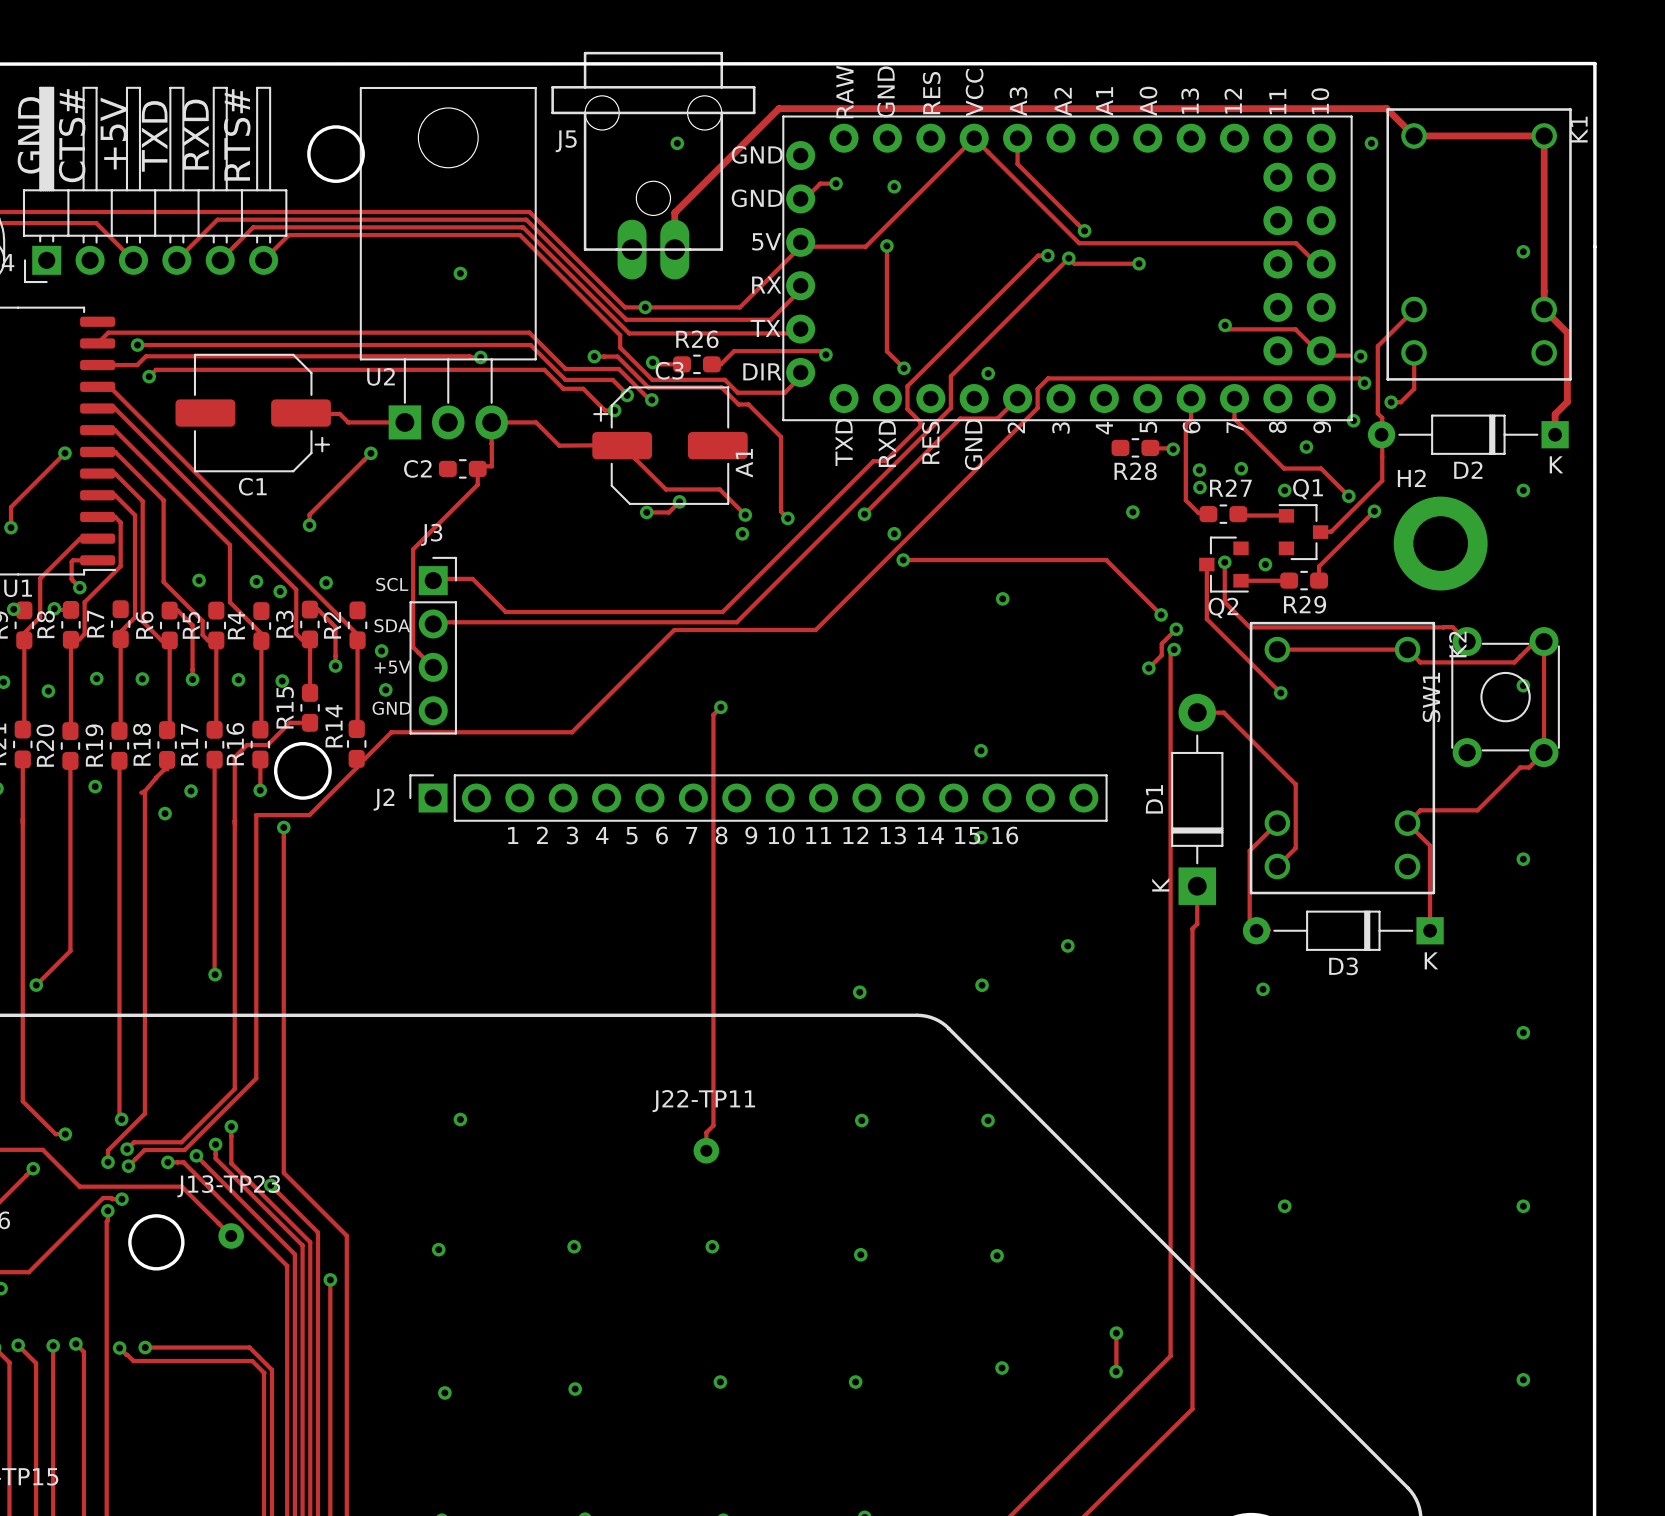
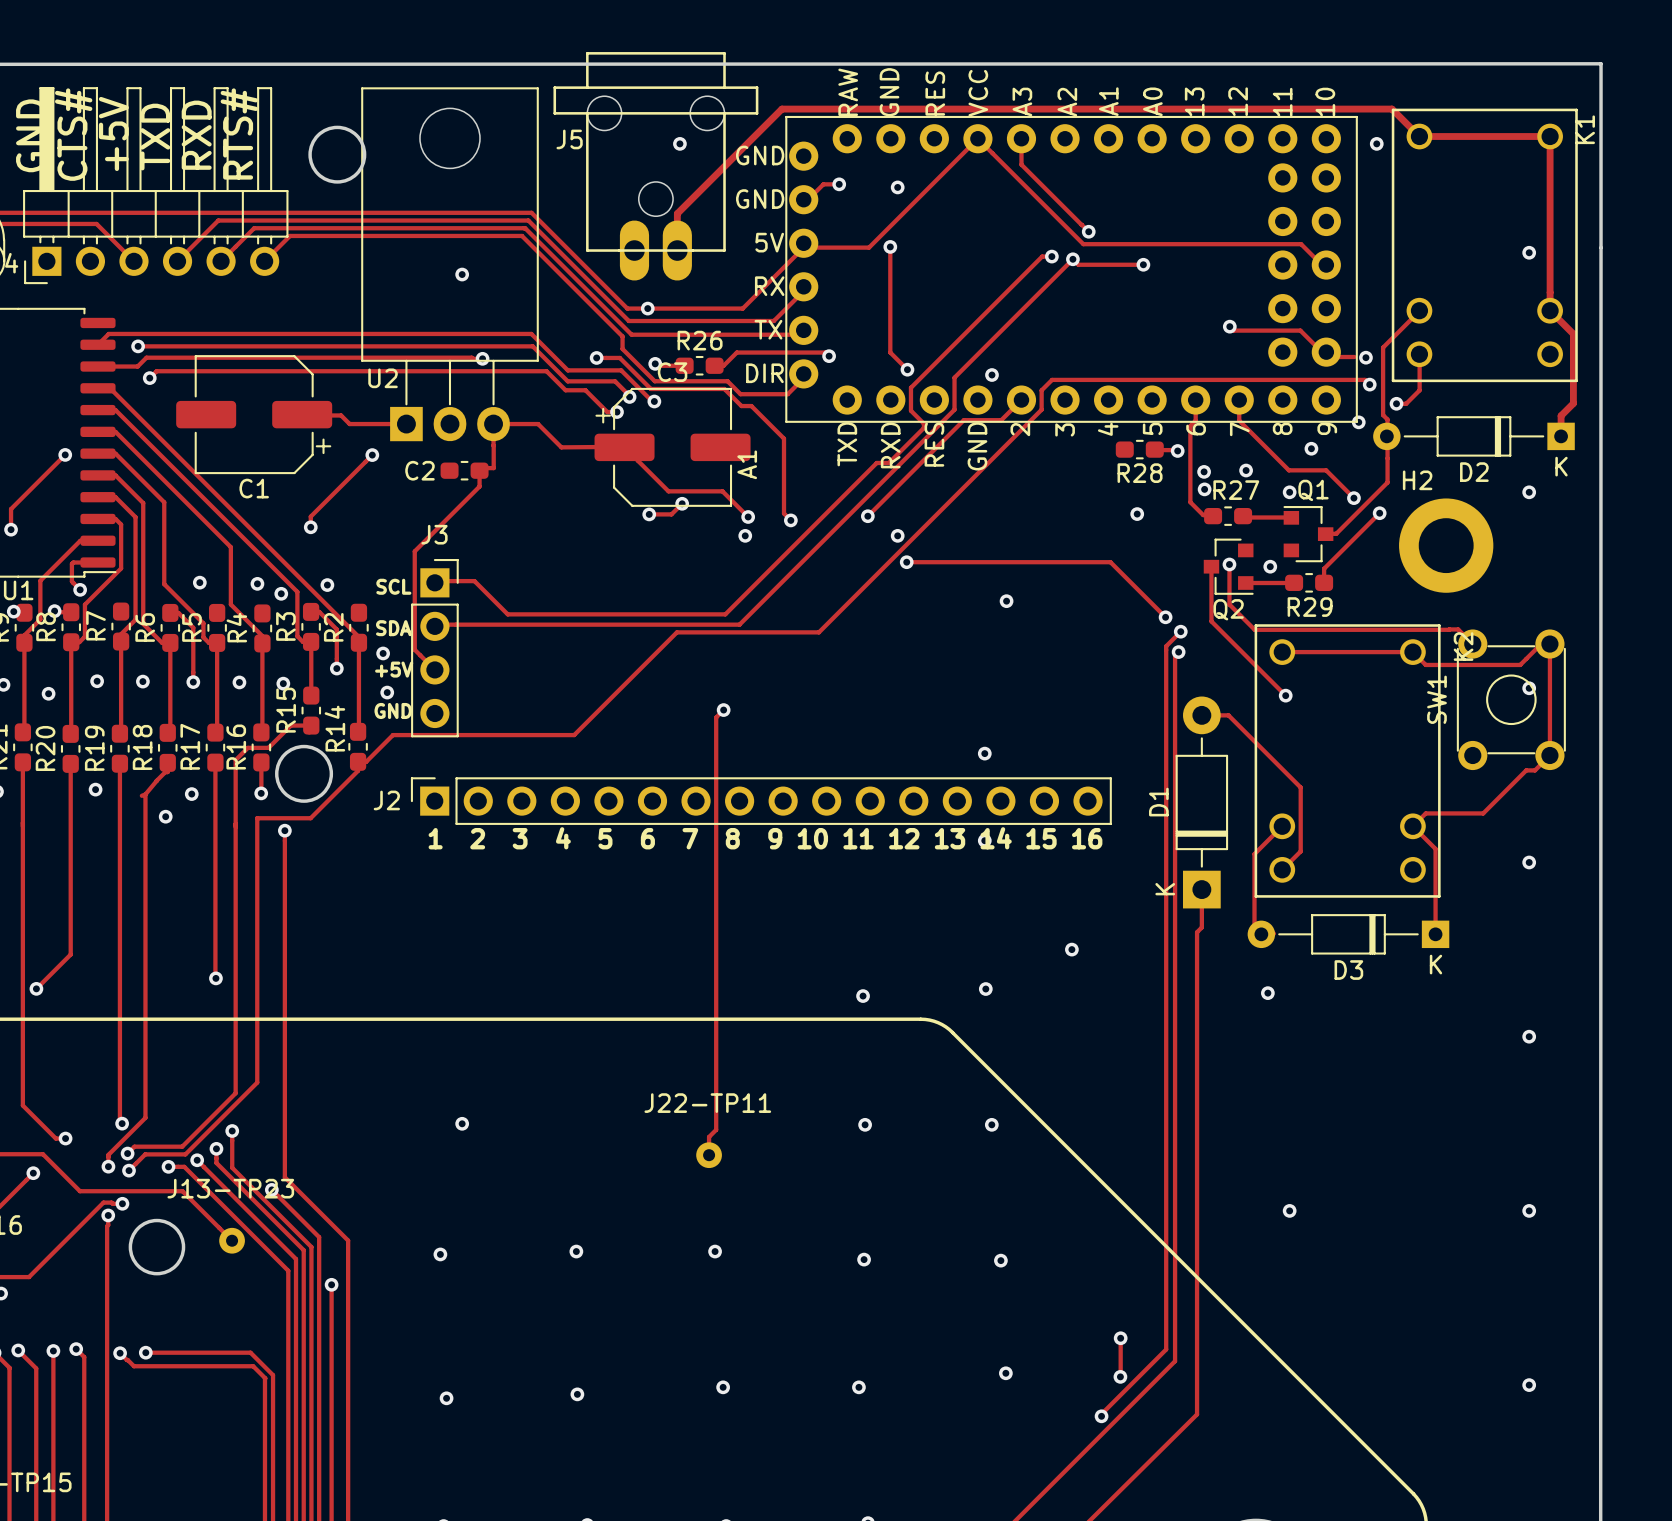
track: (1161, 655) (1148, 668) -> (1166, 657) (1166, 1349) (1101, 1414) (1101, 1416)
via: (1148, 668) -> none
via: none -> (1101, 1416)

